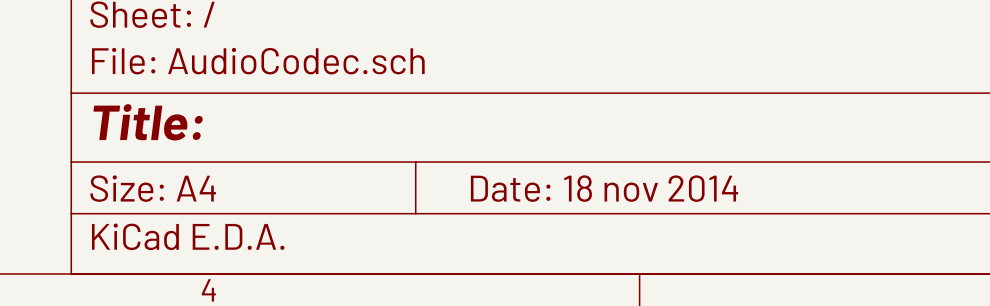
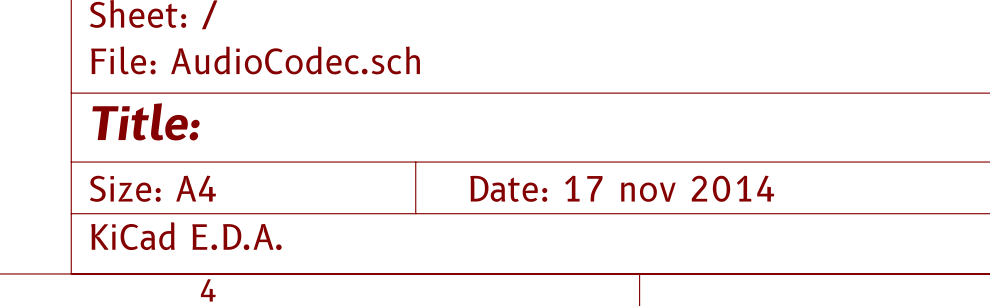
title block: Date: 18 nov 2014 (604, 188) -> Date: 17 nov 2014 (622, 188)

